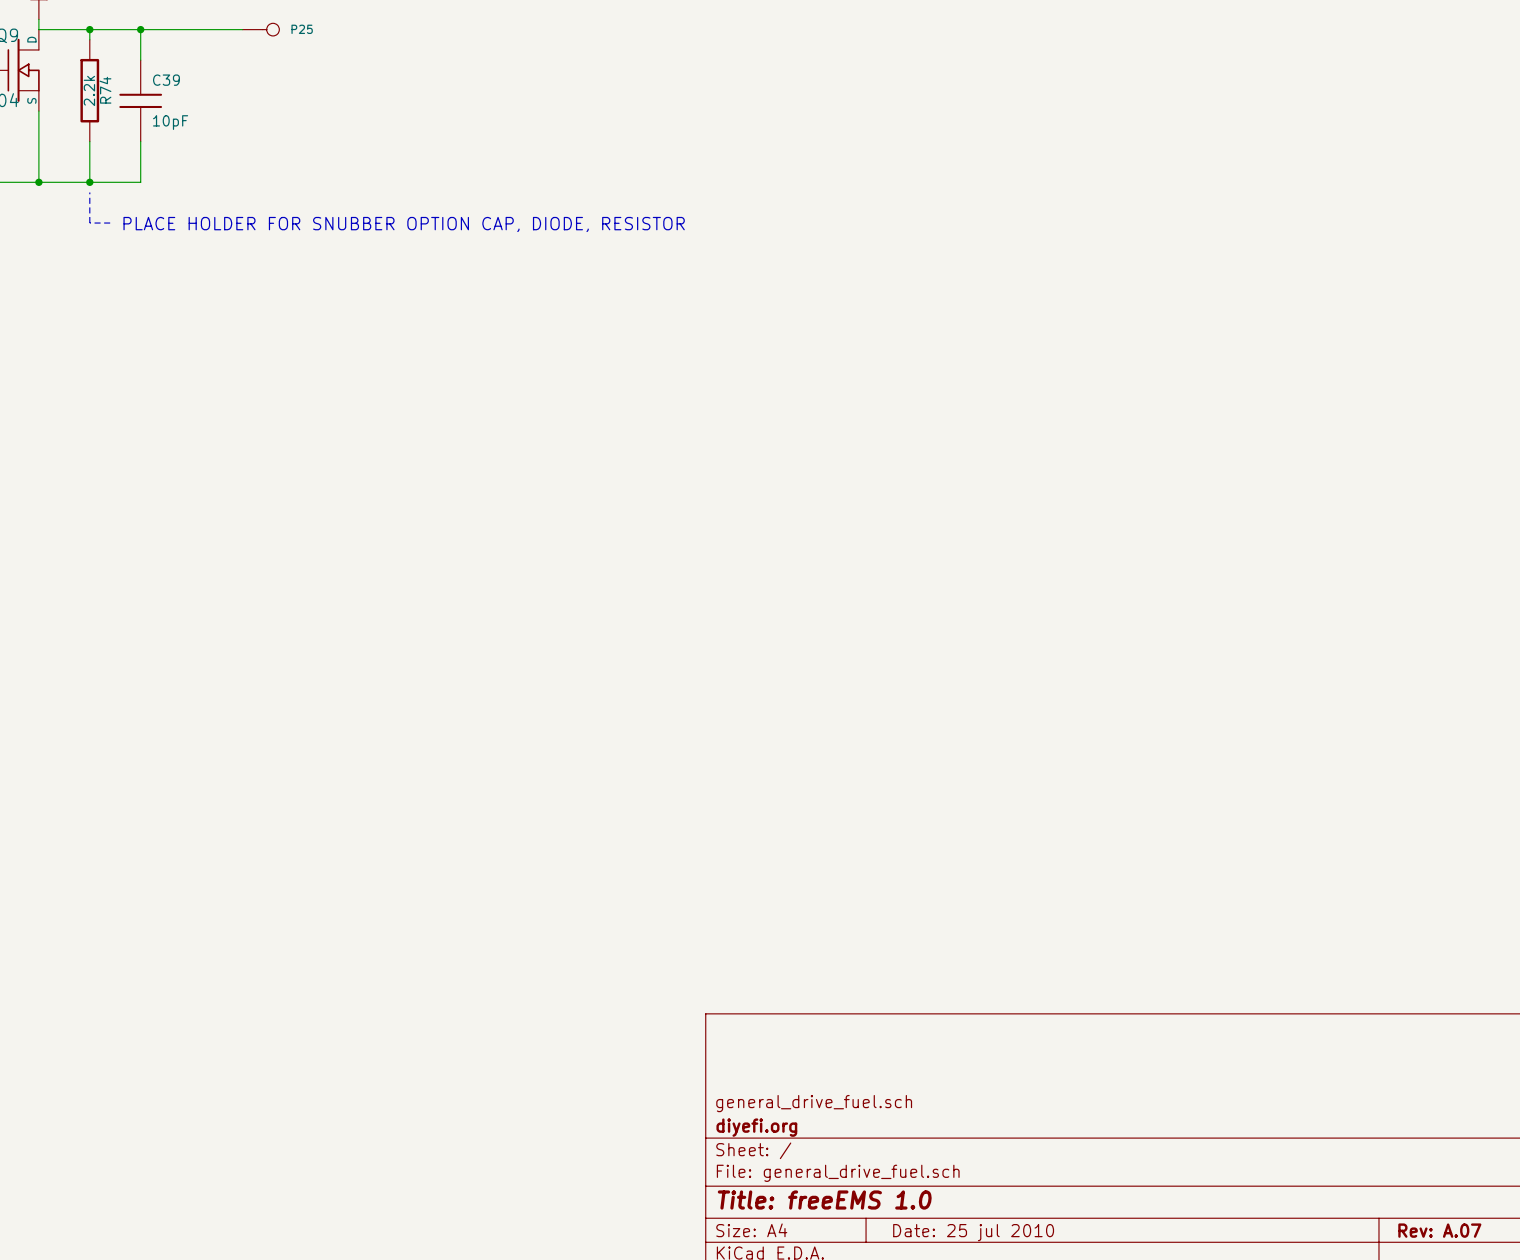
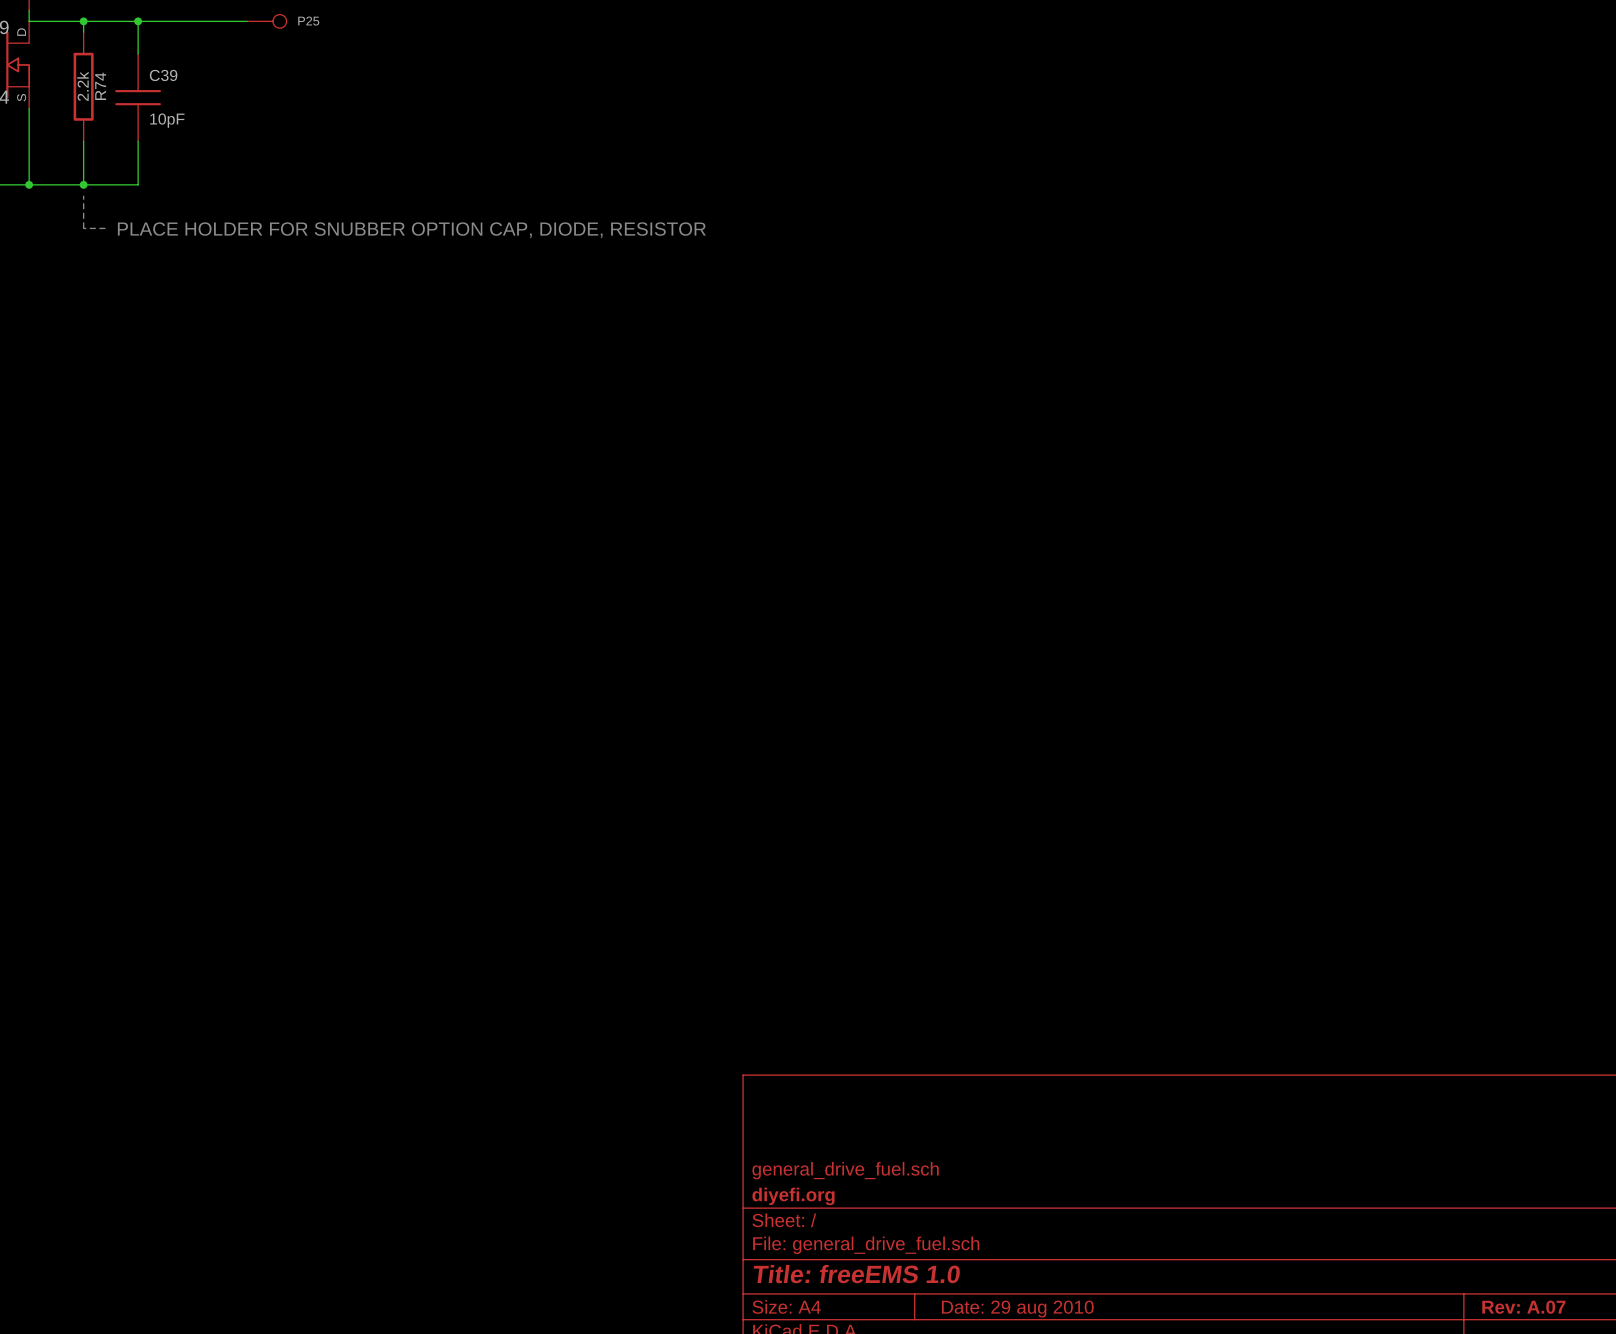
title block: Date: 25 jul 2010 (973, 1232) -> Date: 29 aug 2010 (1017, 1309)

